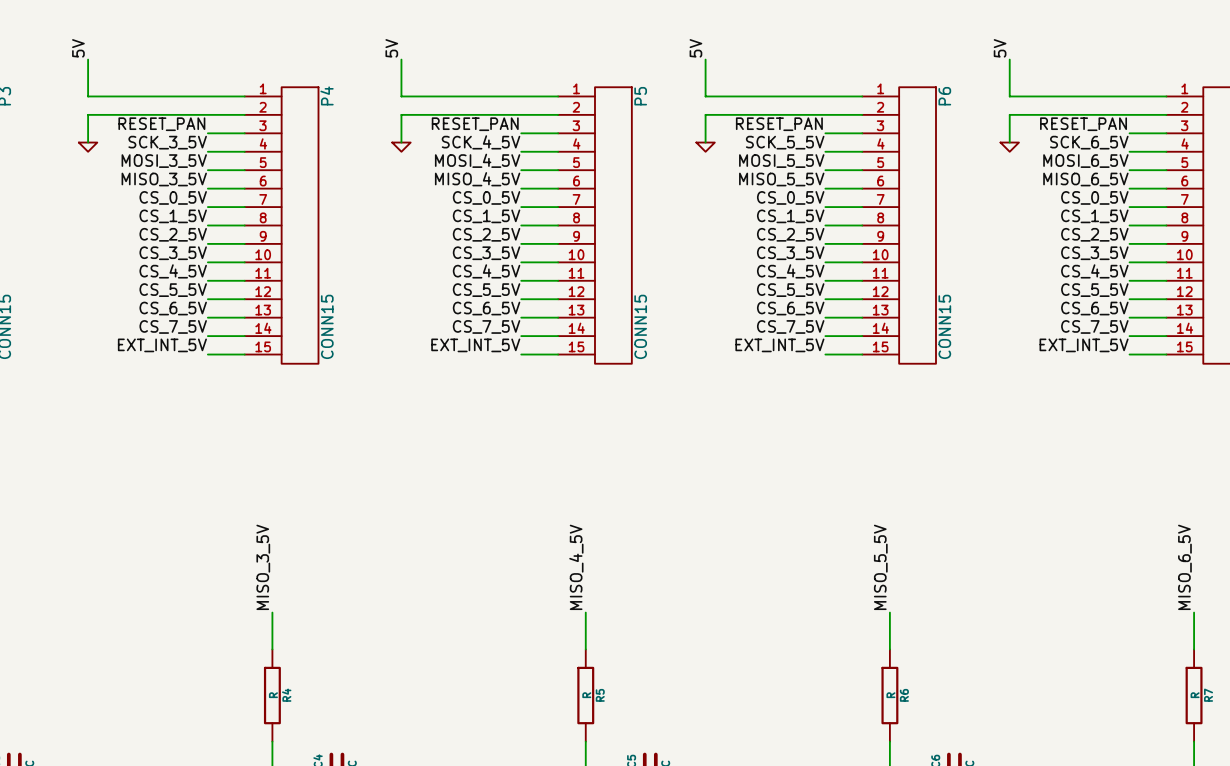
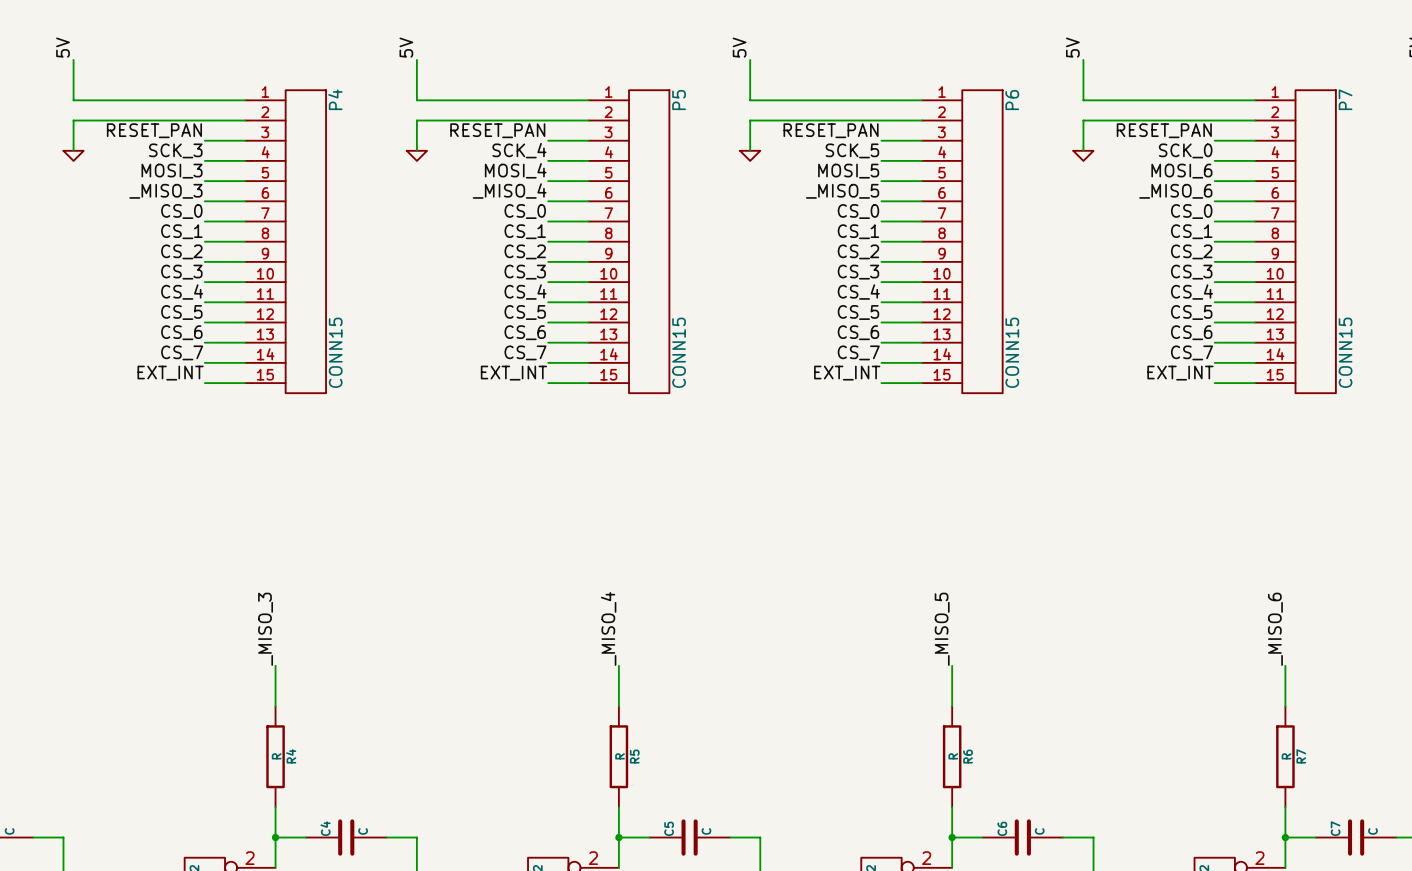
label: SCK_3_5V (167, 142) -> SCK_3 (175, 150)
label: SCK_4_5V (481, 142) -> SCK_4 (519, 150)
label: SCK_5_5V (785, 142) -> SCK_5 (852, 150)
label: SCK_6_5V (1089, 142) -> SCK_0 (1185, 150)
label: MOSI_4_5V (477, 160) -> MOSI_4 (515, 170)
label: MOSI_3_5V (164, 161) -> MOSI_3 (172, 171)
label: MOSI_5_5V (781, 161) -> MOSI_5 (848, 171)
label: MOSI_6_5V (1085, 161) -> MOSI_6 (1181, 171)
label: MISO_3_5V (164, 179) -> _MISO_3 (165, 191)
label: MISO_4_5V (477, 179) -> _MISO_4 (509, 191)
label: MISO_5_5V (781, 179) -> _MISO_5 (842, 191)
label: MISO_6_5V (1085, 179) -> _MISO_6 (1175, 191)
label: CS_0_5V (173, 197) -> CS_0 (181, 211)
label: CS_0_5V (486, 197) -> CS_0 (525, 211)
label: CS_0_5V (790, 197) -> CS_0 (858, 211)
label: CS_0_5V (1094, 197) -> CS_0 (1191, 211)
label: CS_1_5V (173, 216) -> CS_1 (181, 231)
label: CS_1_5V (486, 216) -> CS_1 (525, 231)
label: CS_1_5V (790, 216) -> CS_1 (858, 231)
label: CS_1_5V (1094, 216) -> CS_1 (1191, 231)
label: CS_2_5V (173, 234) -> CS_2 (181, 251)
label: CS_2_5V (486, 234) -> CS_2 (525, 251)
label: CS_2_5V (790, 234) -> CS_2 (858, 251)
label: CS_2_5V (1094, 234) -> CS_2 (1191, 251)
label: CS_3_5V (173, 253) -> CS_3 (181, 272)
label: CS_3_5V (486, 253) -> CS_3 (525, 272)
label: CS_3_5V (790, 253) -> CS_3 (858, 272)
label: CS_3_5V (1094, 253) -> CS_3 (1191, 272)
label: CS_4_5V (173, 271) -> CS_4 (182, 292)
label: CS_4_5V (486, 271) -> CS_4 (525, 292)
label: CS_4_5V (790, 271) -> CS_4 (858, 292)
label: CS_4_5V (1094, 271) -> CS_4 (1192, 292)
label: CS_5_5V (173, 290) -> CS_5 (181, 312)
label: CS_5_5V (486, 290) -> CS_5 (525, 312)
label: CS_5_5V (790, 290) -> CS_5 (858, 312)
label: CS_5_5V (1094, 290) -> CS_5 (1191, 312)
label: CS_6_5V (173, 308) -> CS_6 (181, 332)
label: CS_6_5V (486, 308) -> CS_6 (525, 332)
label: CS_6_5V (790, 308) -> CS_6 (858, 332)
label: CS_6_5V (1094, 308) -> CS_6 (1191, 332)
label: CS_7_5V (173, 326) -> CS_7 (182, 352)
label: CS_7_5V (486, 326) -> CS_7 (525, 352)
label: CS_7_5V (790, 326) -> CS_7 (858, 352)
label: CS_7_5V (1094, 326) -> CS_7 (1192, 352)
label: EXT_INT_5V (162, 345) -> EXT_INT (170, 373)
label: EXT_INT_5V (475, 345) -> EXT_INT (513, 373)
label: EXT_INT_5V (779, 345) -> EXT_INT (847, 373)
label: EXT_INT_5V (1084, 345) -> EXT_INT (1180, 373)
label: MISO_3_5V (263, 567) -> _MISO_3 (265, 629)
label: MISO_4_5V (576, 567) -> _MISO_4 (608, 628)
label: MISO_5_5V (880, 567) -> _MISO_5 (942, 629)
label: MISO_6_5V (1184, 567) -> _MISO_6 (1275, 629)

